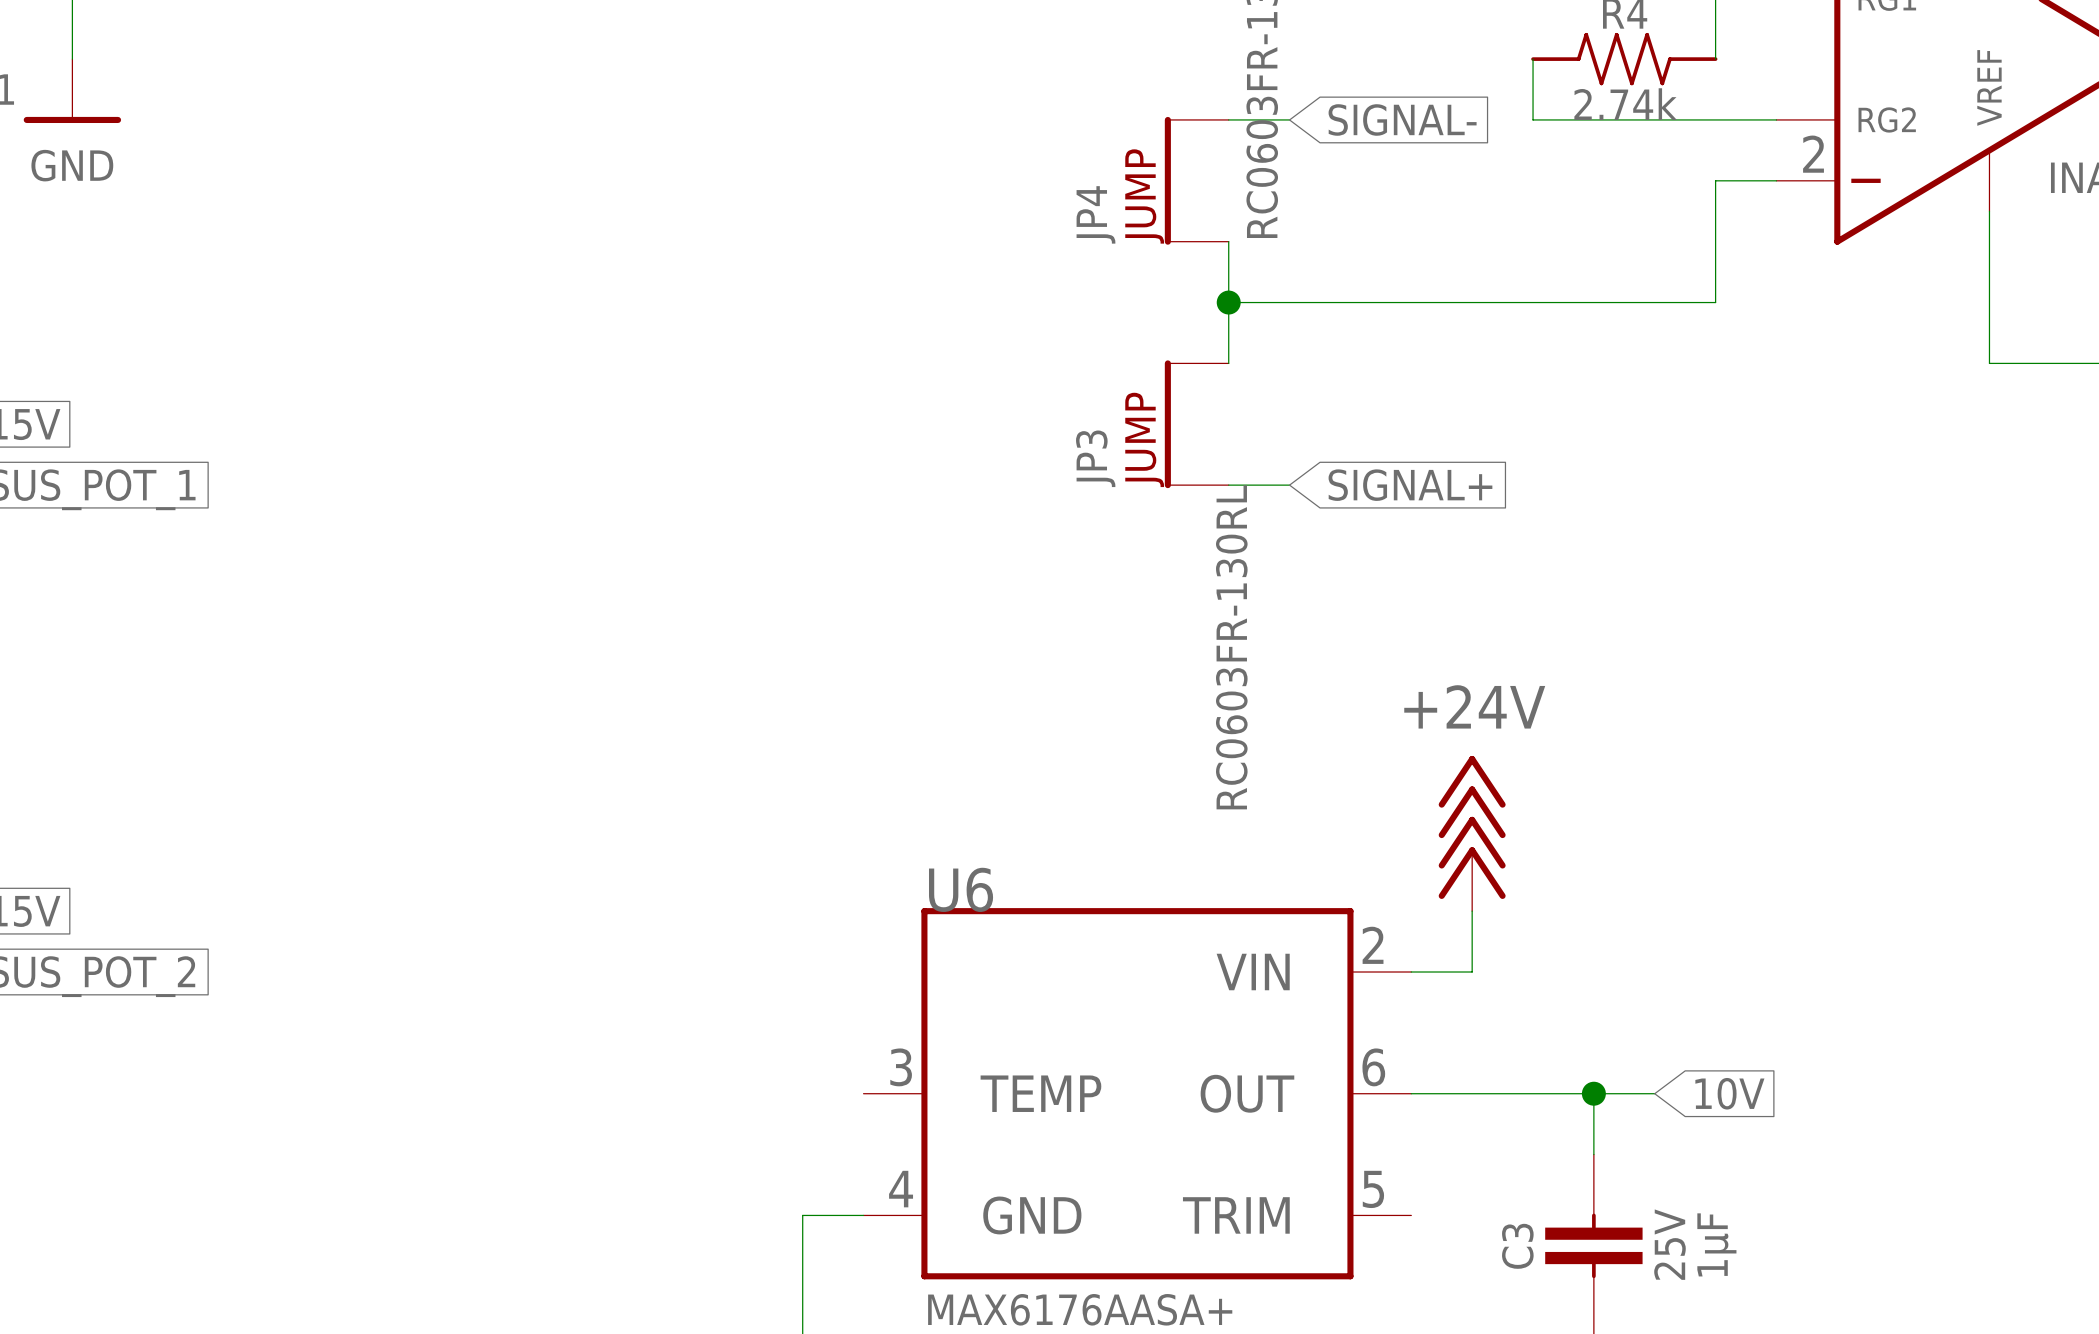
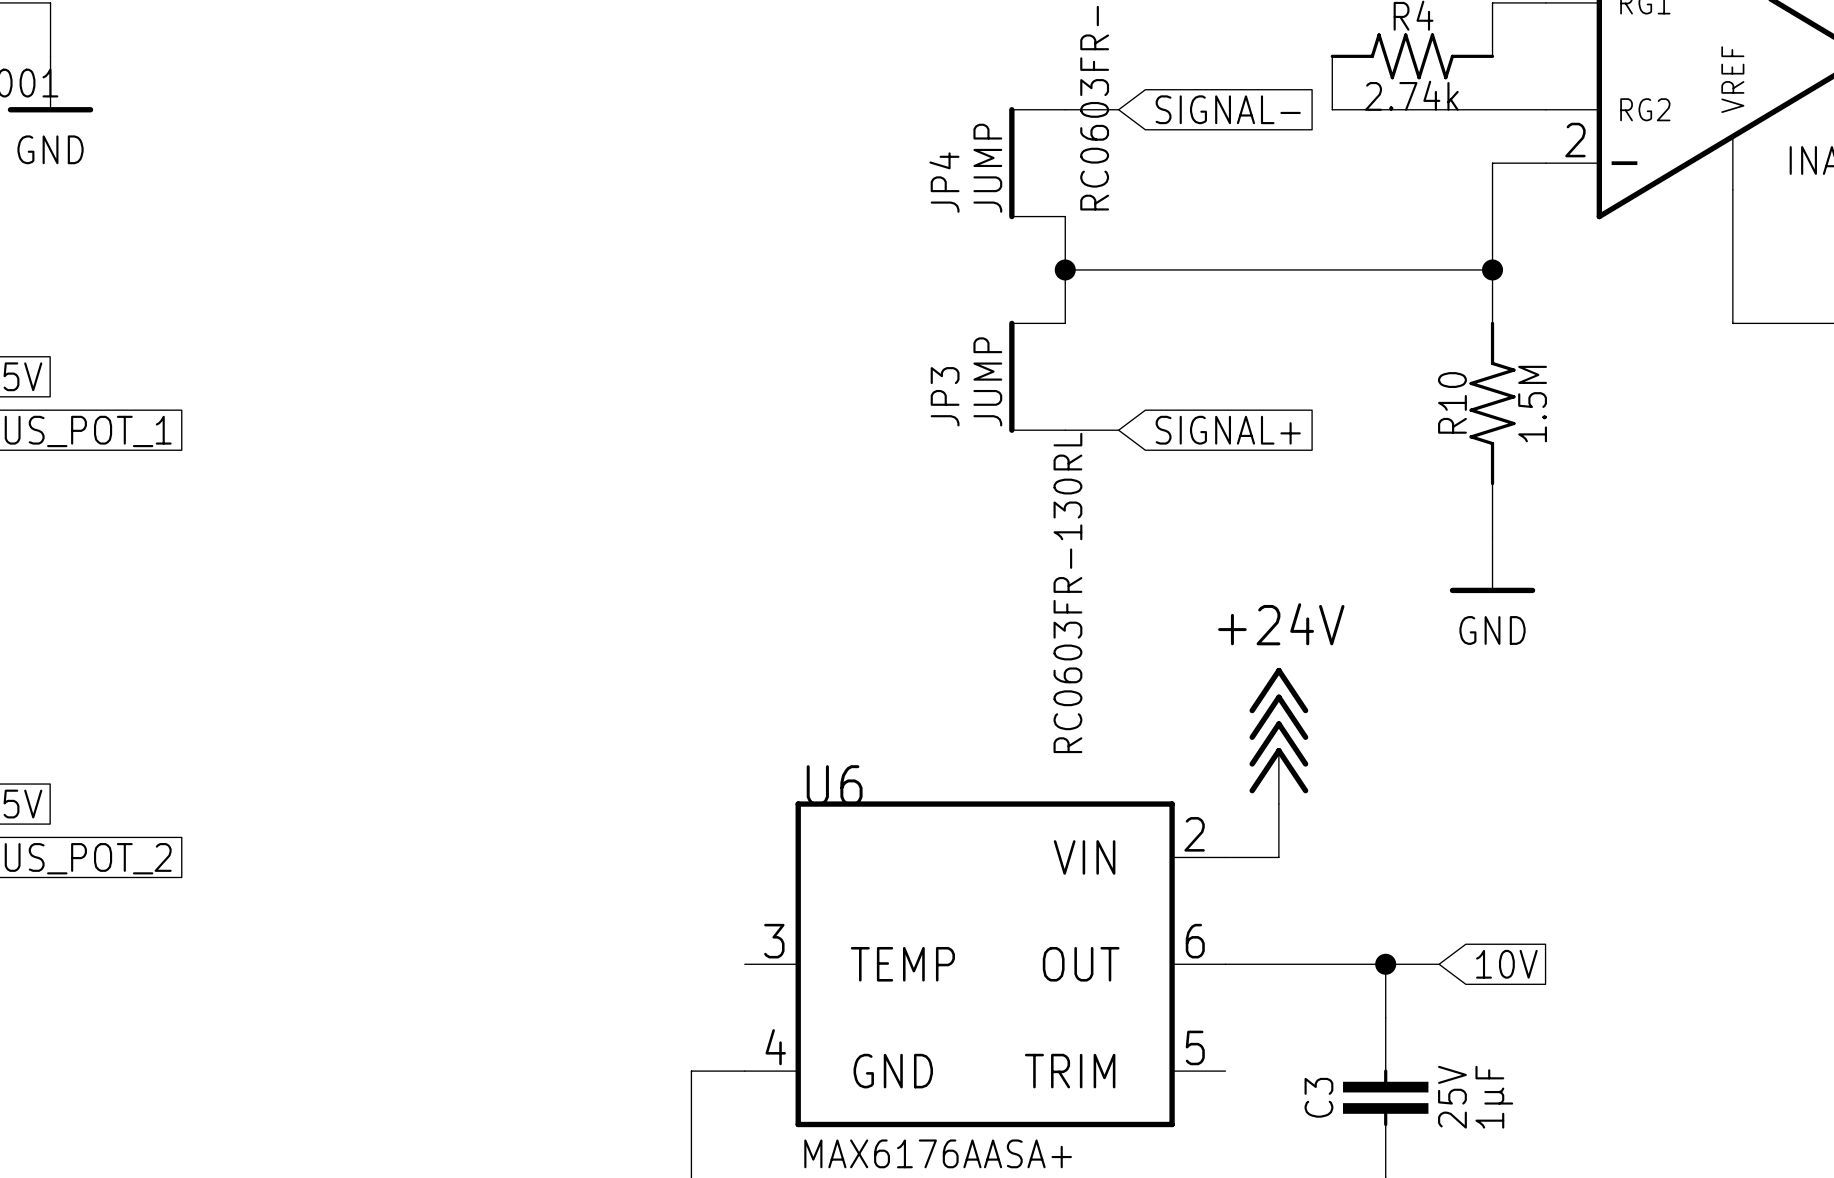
wire: none -> (1492, 269) (1492, 323)
junction: none -> (1492, 269)
R10: none -> (1492, 403)
wire: none -> (1492, 483) (1492, 537)
power symbol: none -> GND (1492, 565)

